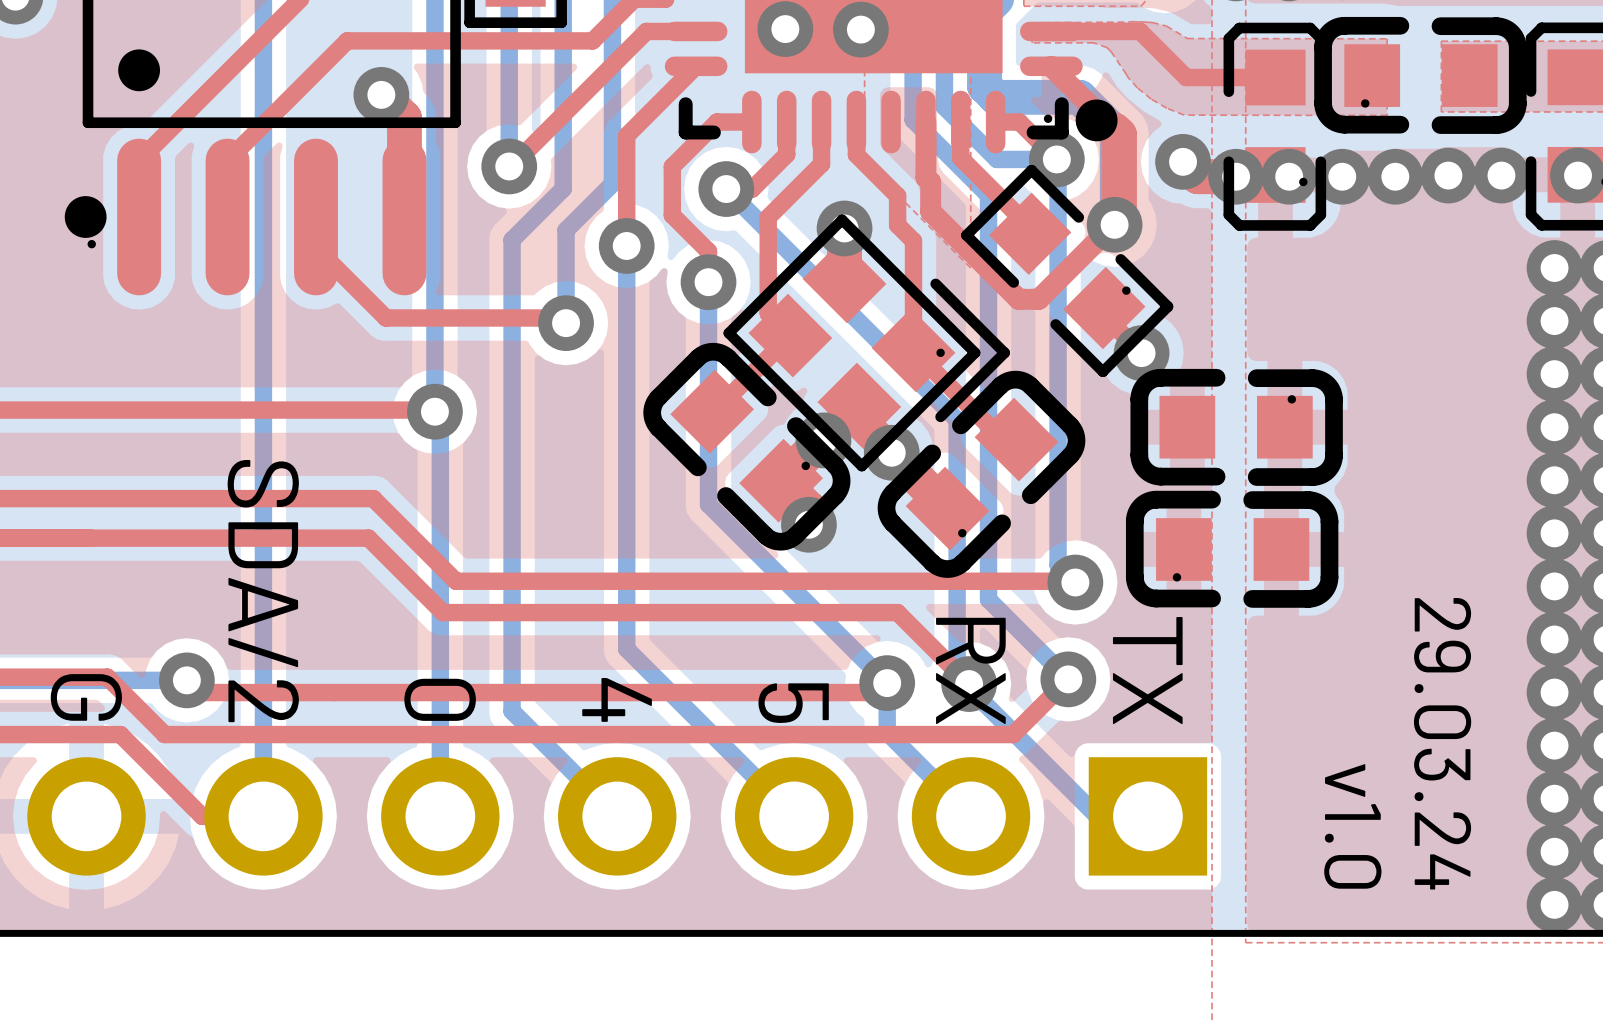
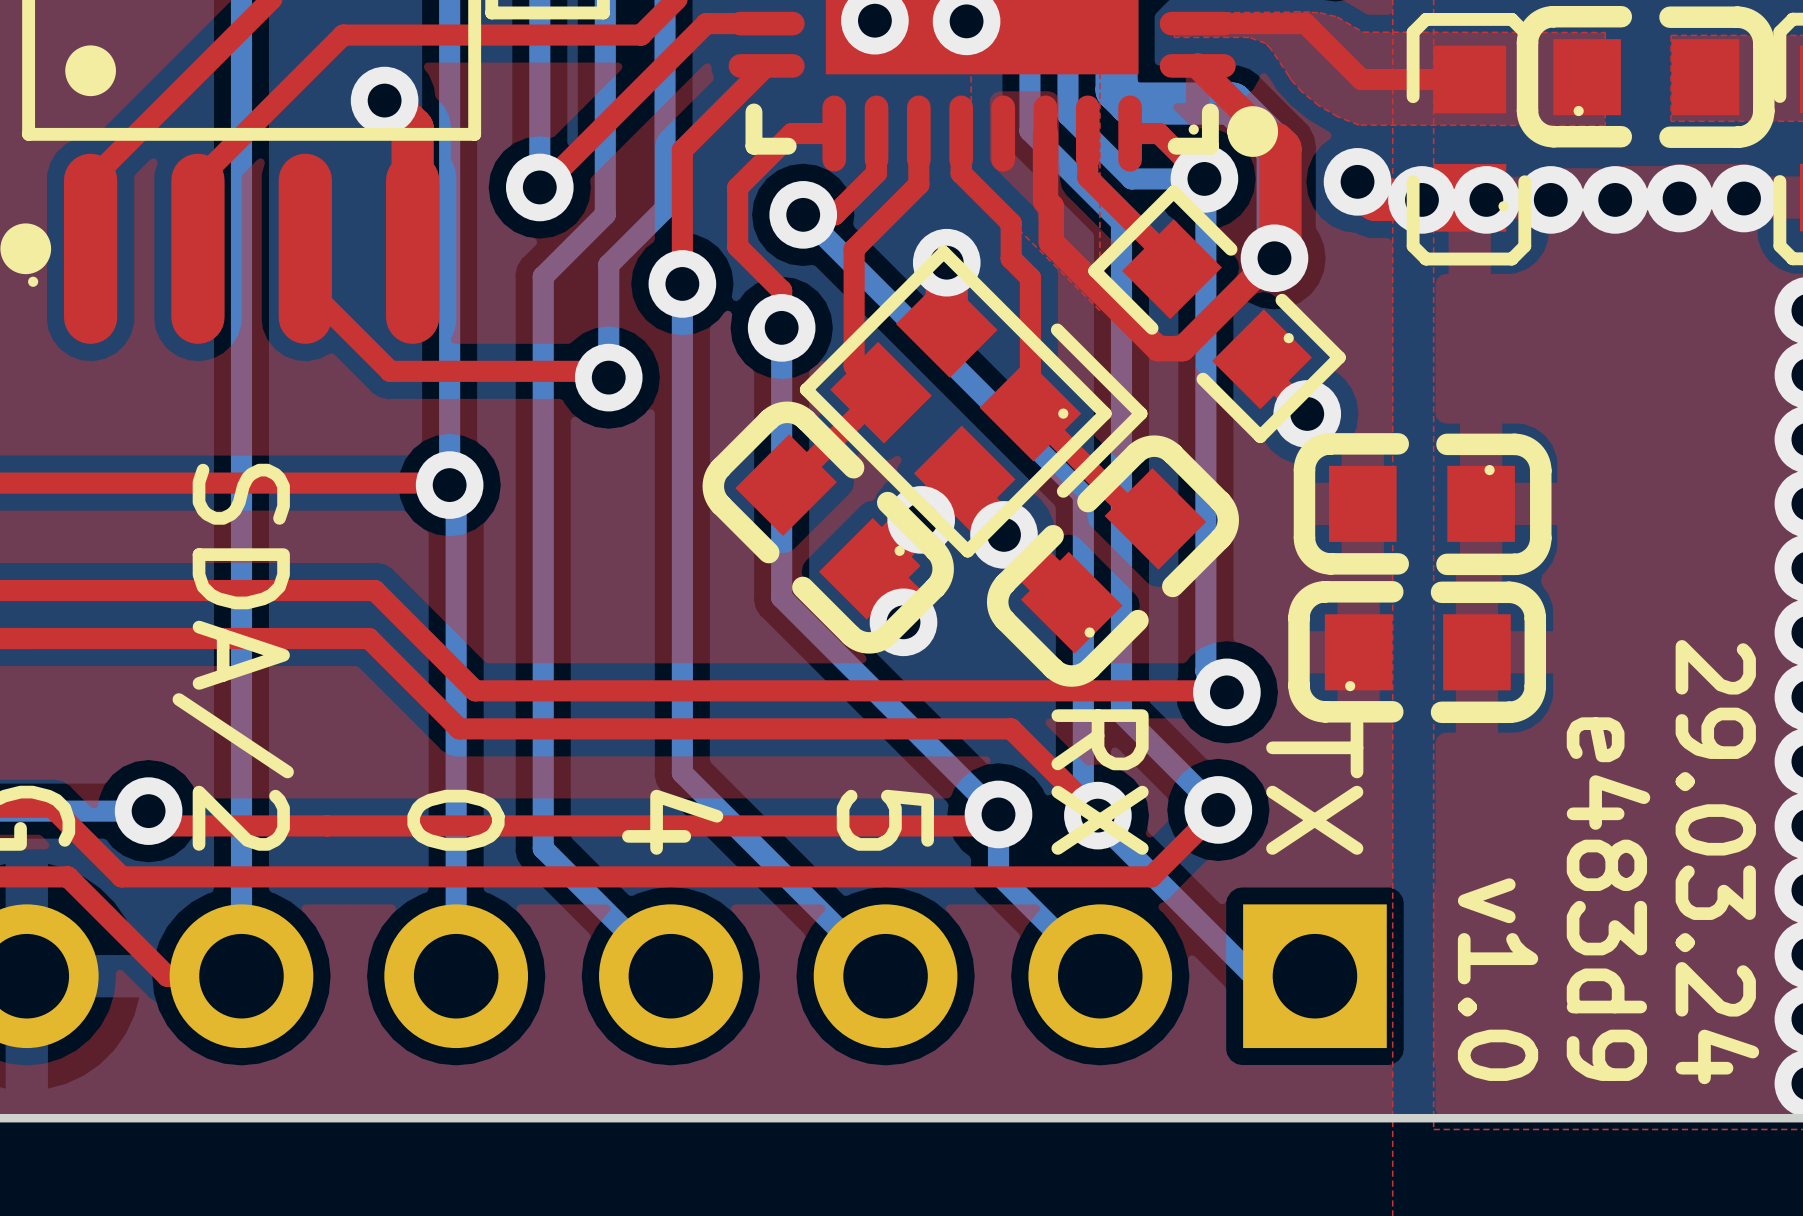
text position: 29.03.24 (1442, 743) -> 29.03.24 (1717, 862)
text: none -> e483d9 (1608, 899)
text position: v1.0 (1352, 826) -> v1.0 (1498, 979)

